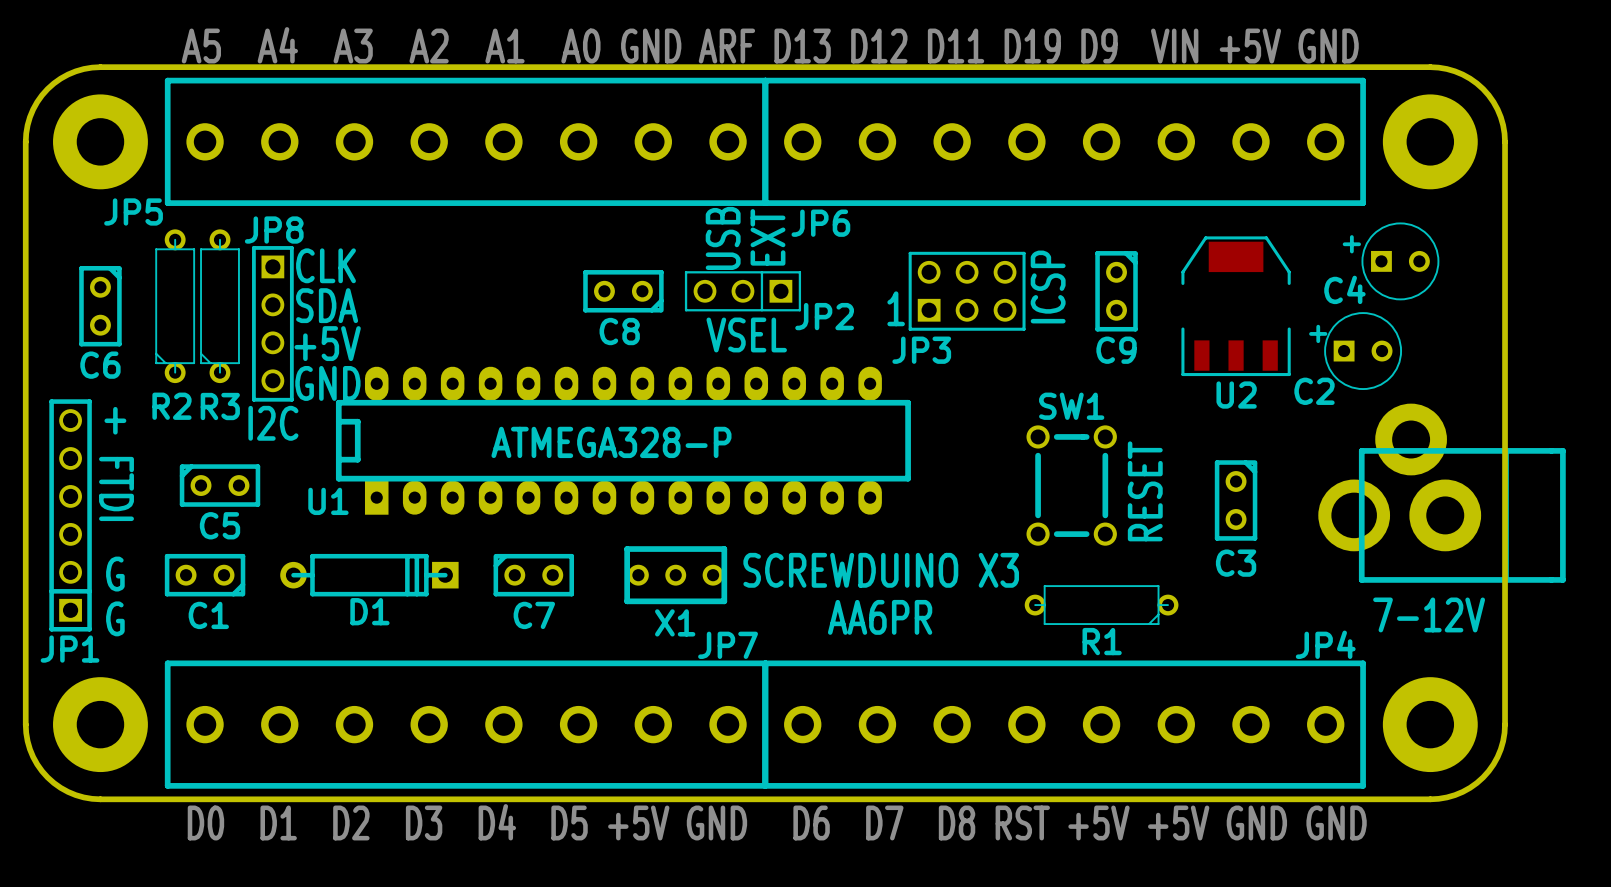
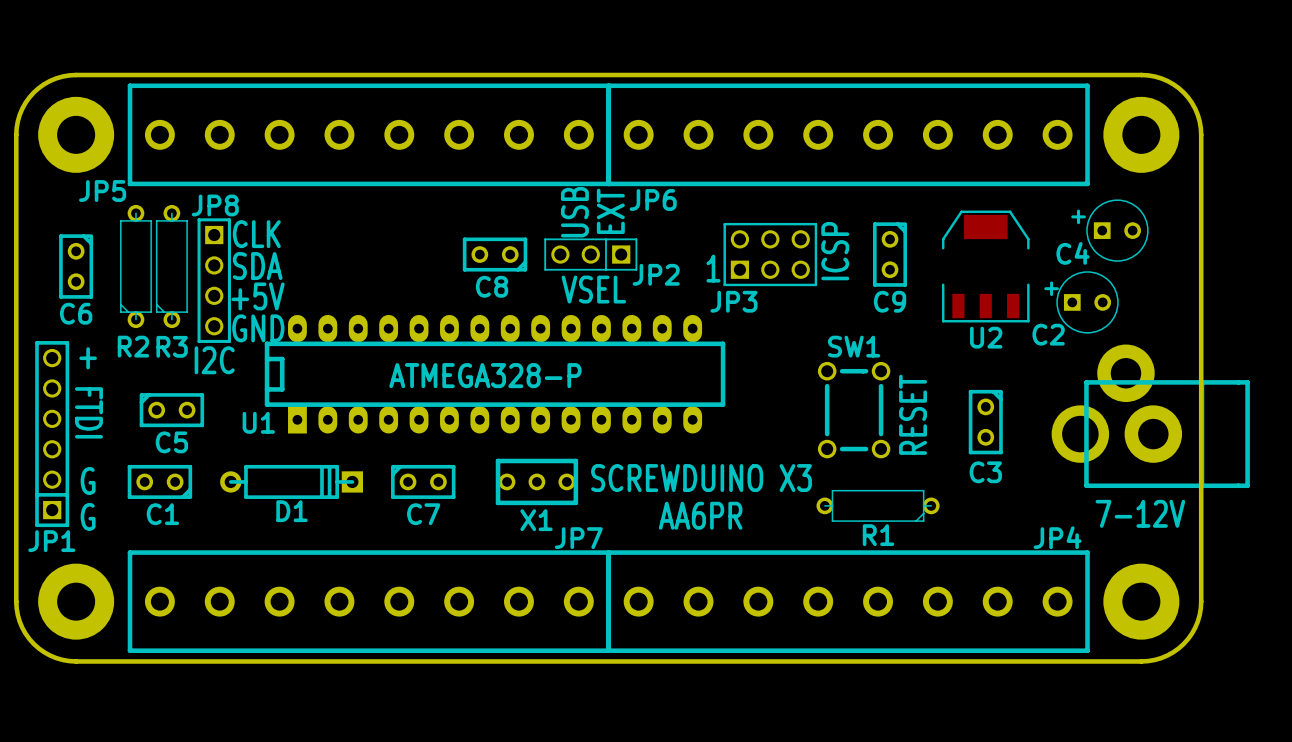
text: A5 A4 A3 A2 A1 A0 (391, 45) -> none
text: GND ARF D13 D12 D11 D19 D9 VIN +5V GND (989, 45) -> none
text: D0 D1 D2 D3 D4 D5 +5V GND (467, 822) -> none
text: D6 D7 D8 RST +5V +5V GND GND (1080, 822) -> none

